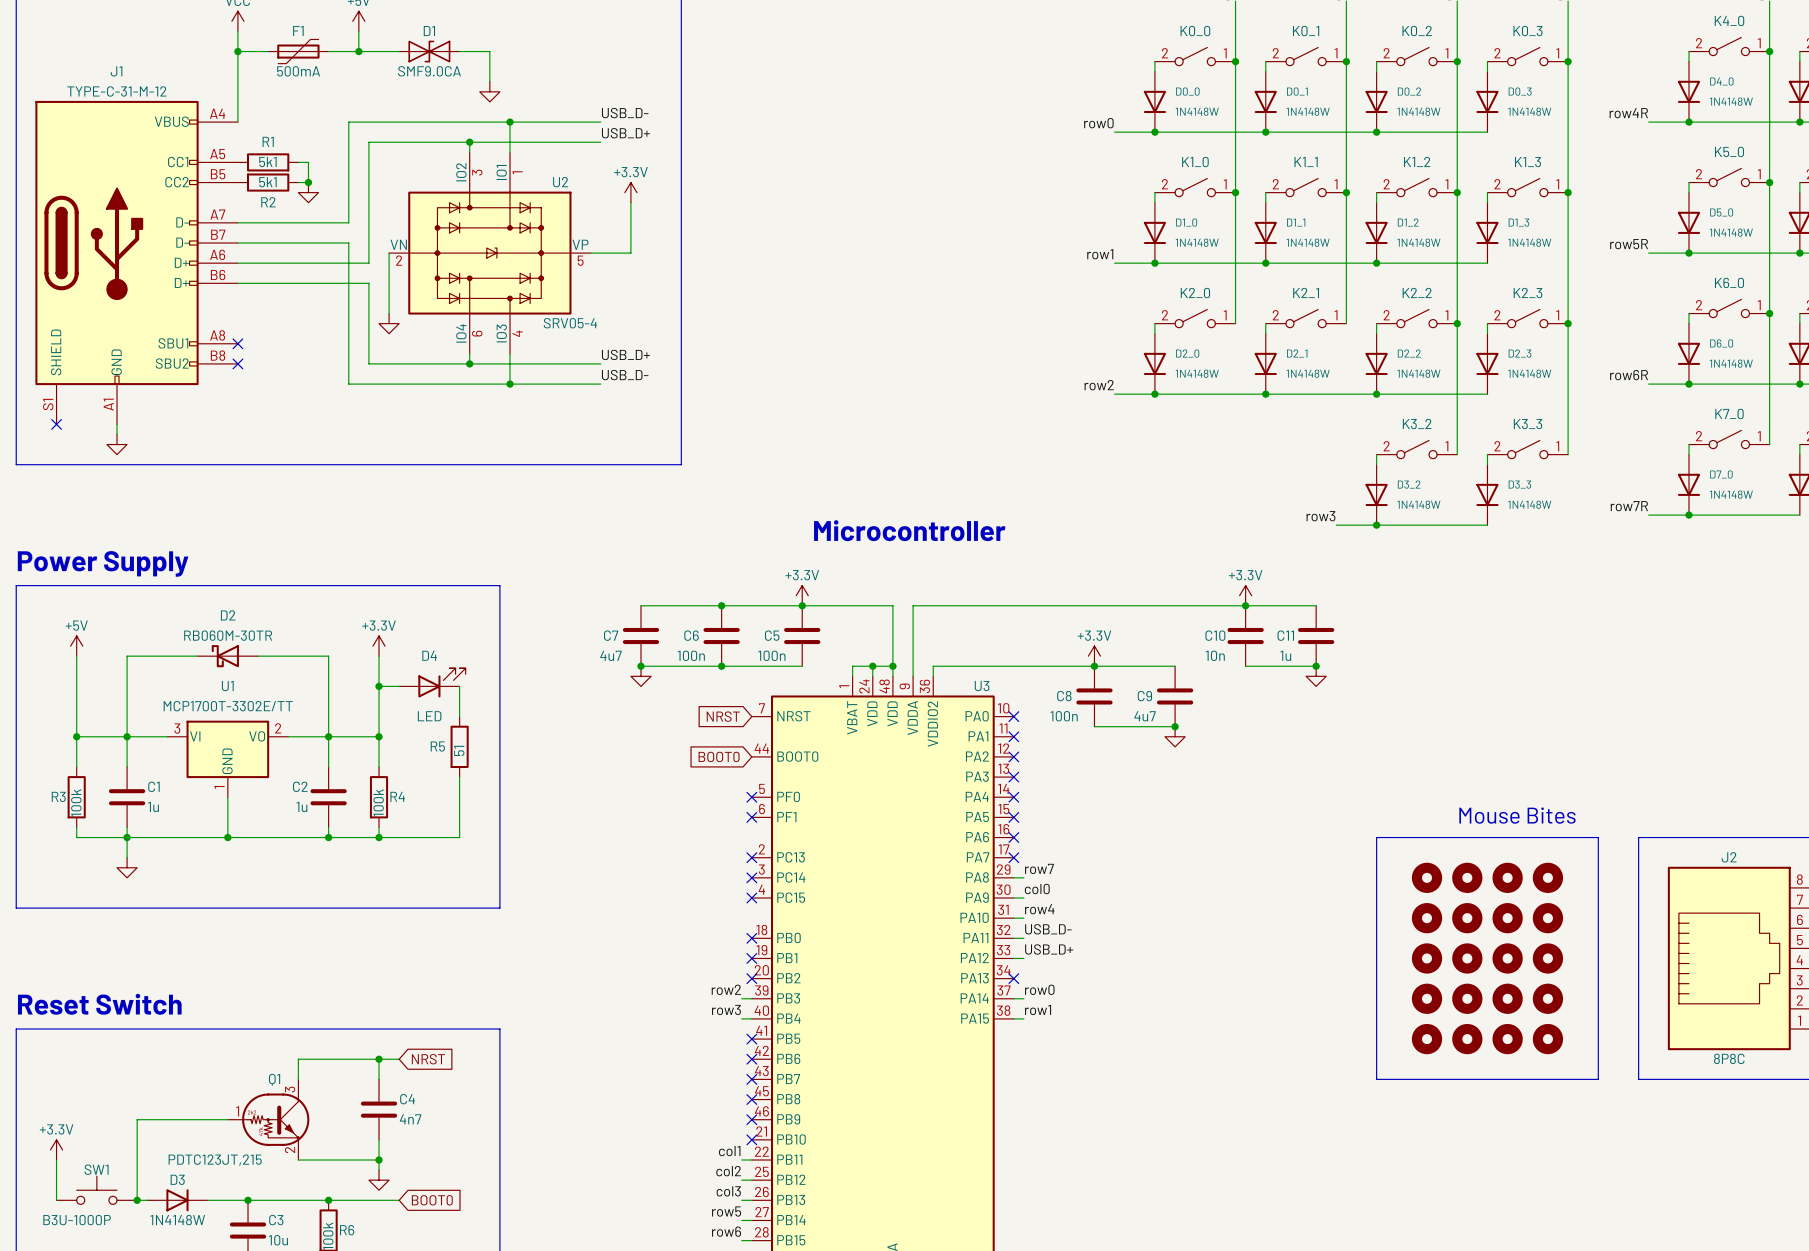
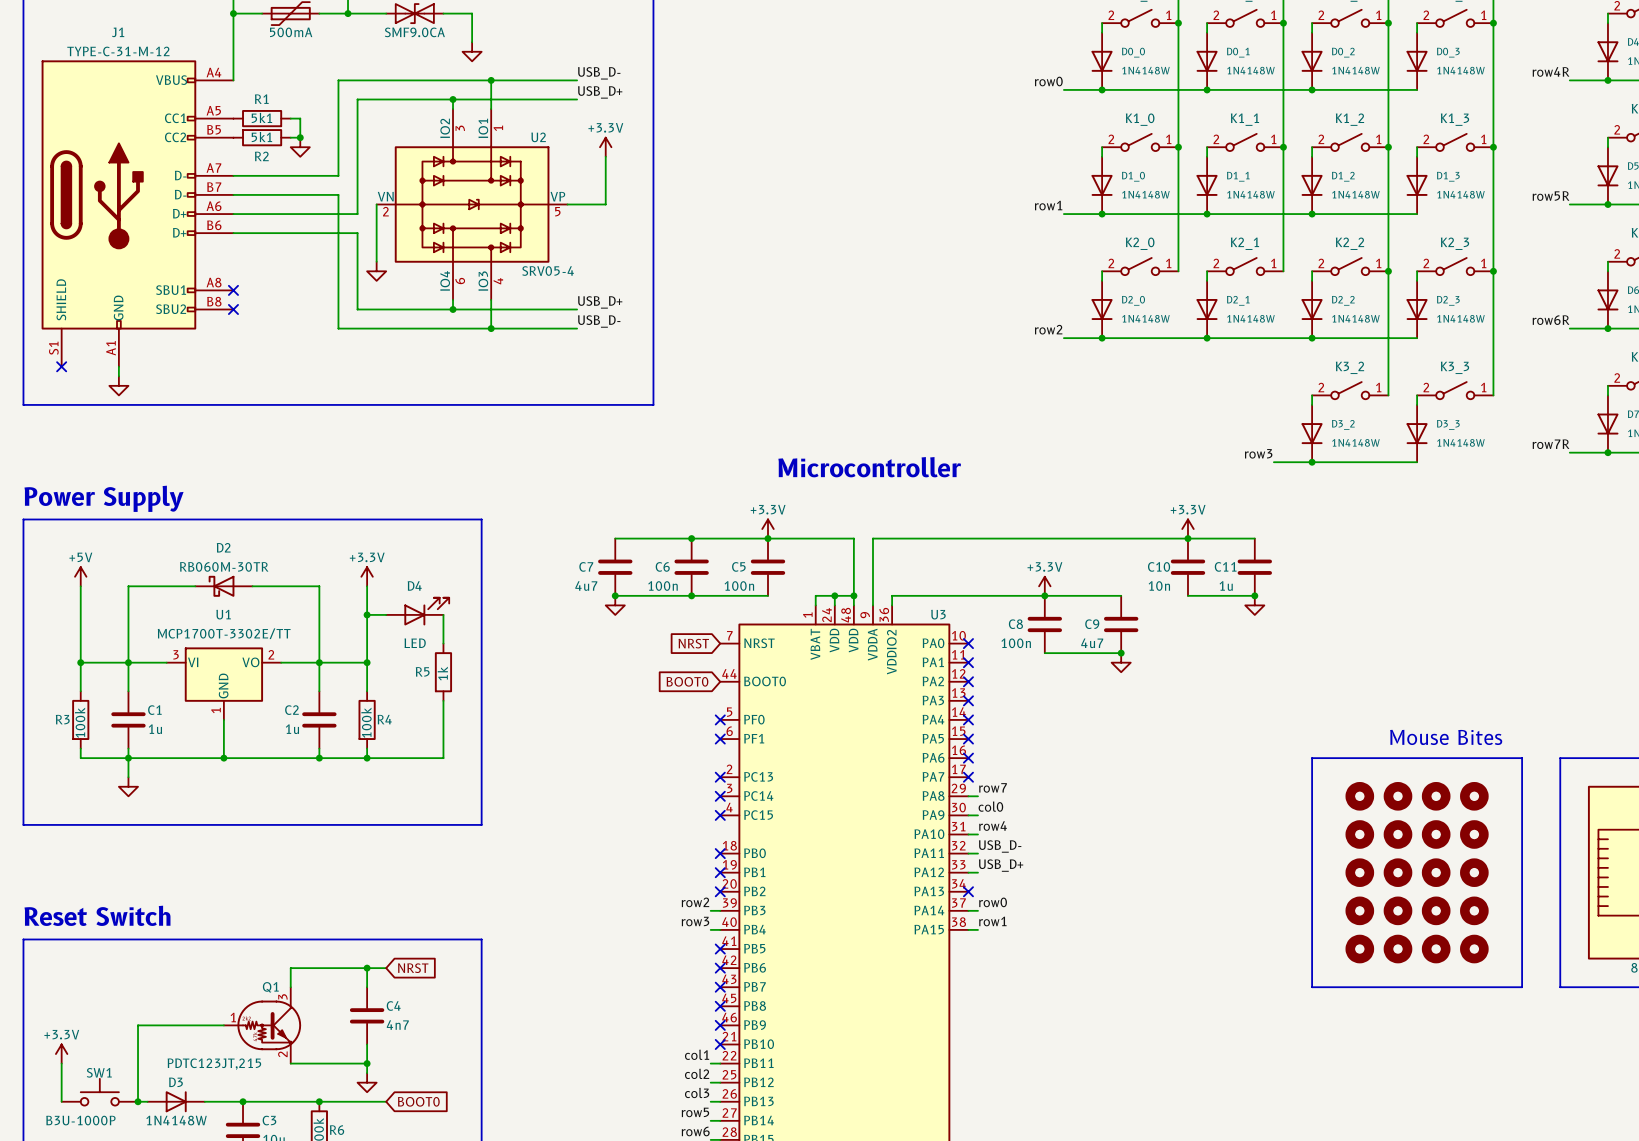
R5 value: 51 (459, 750) -> 1k (442, 673)

